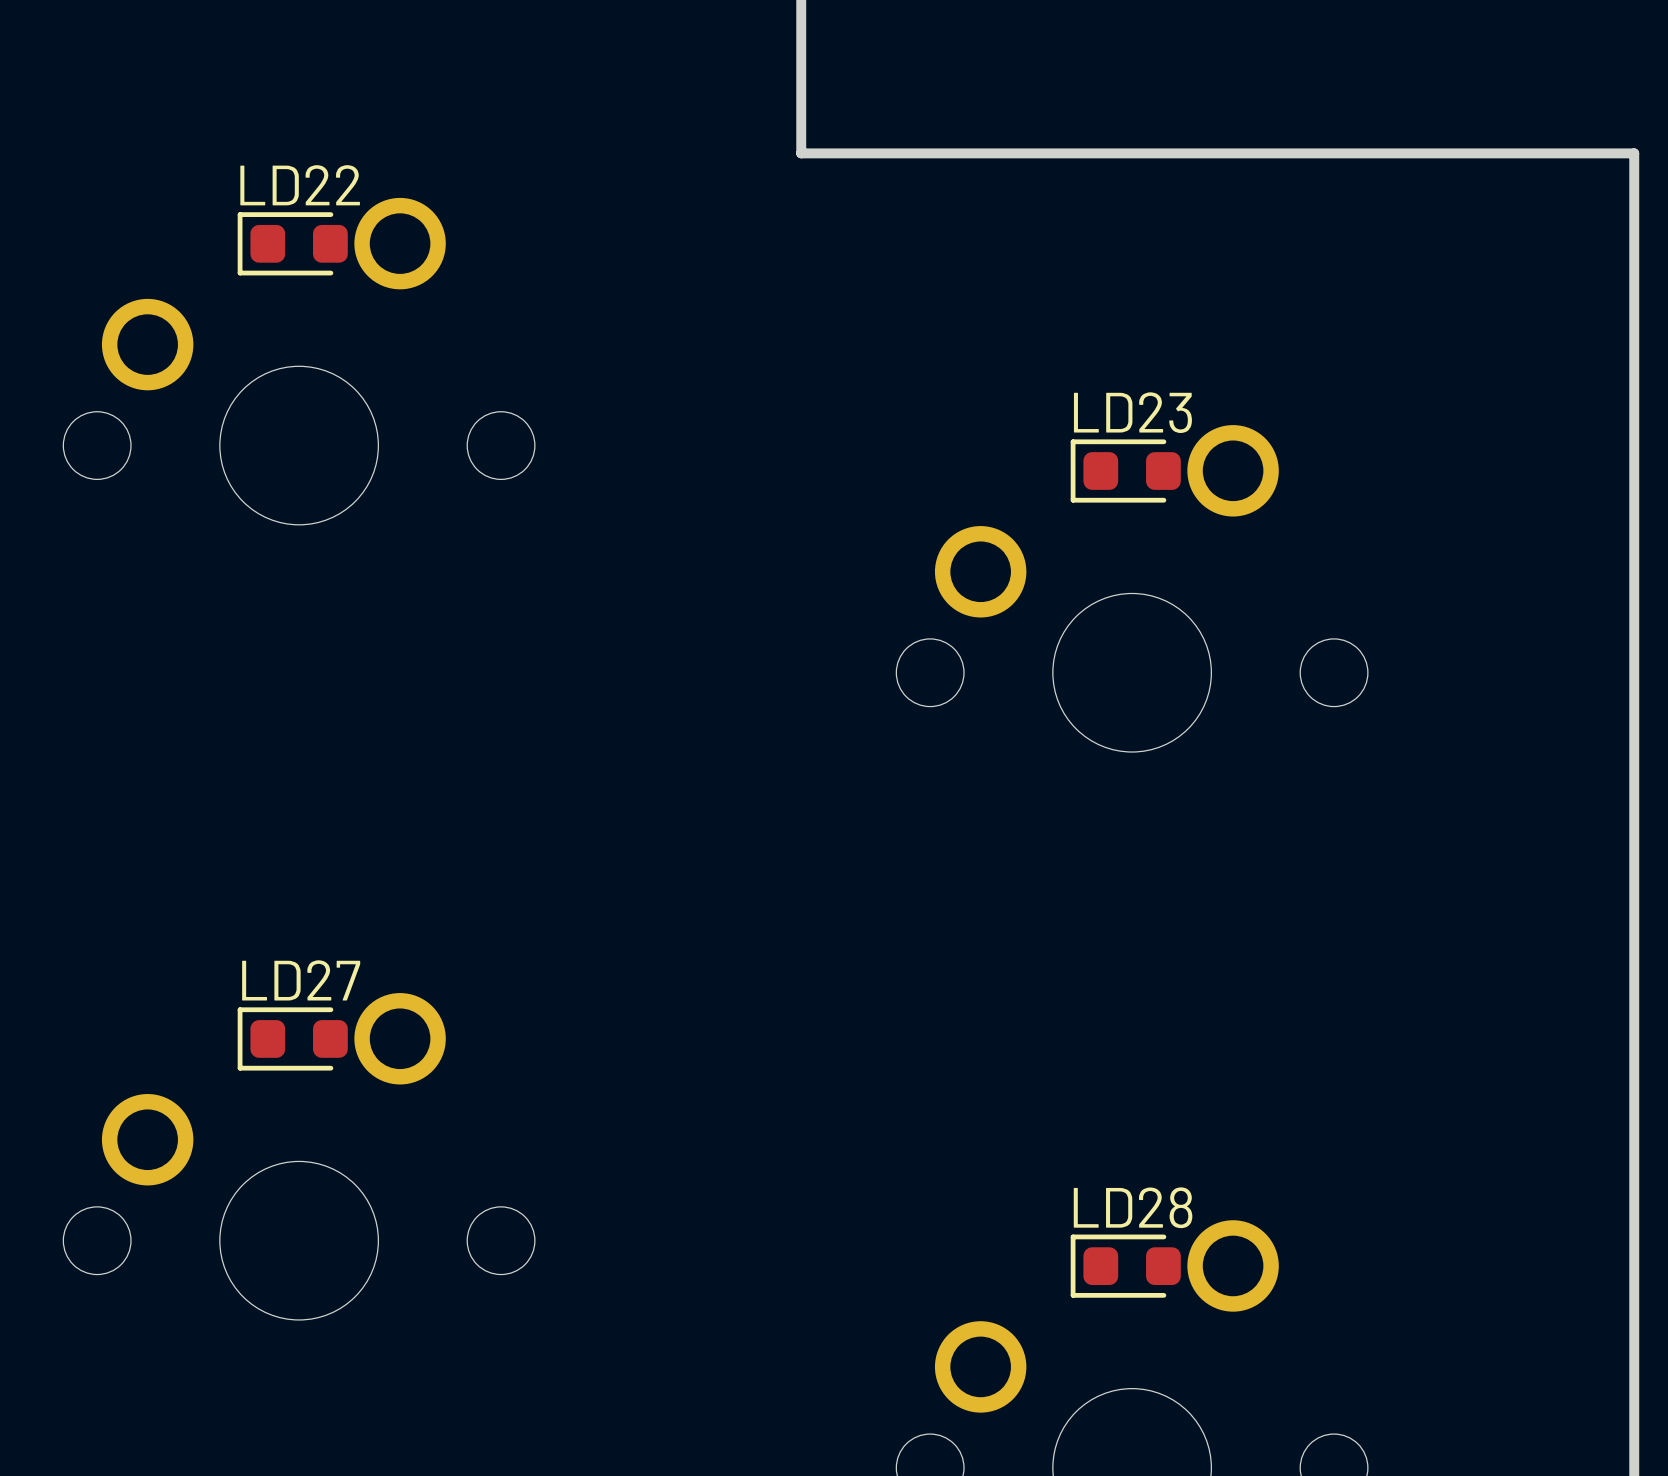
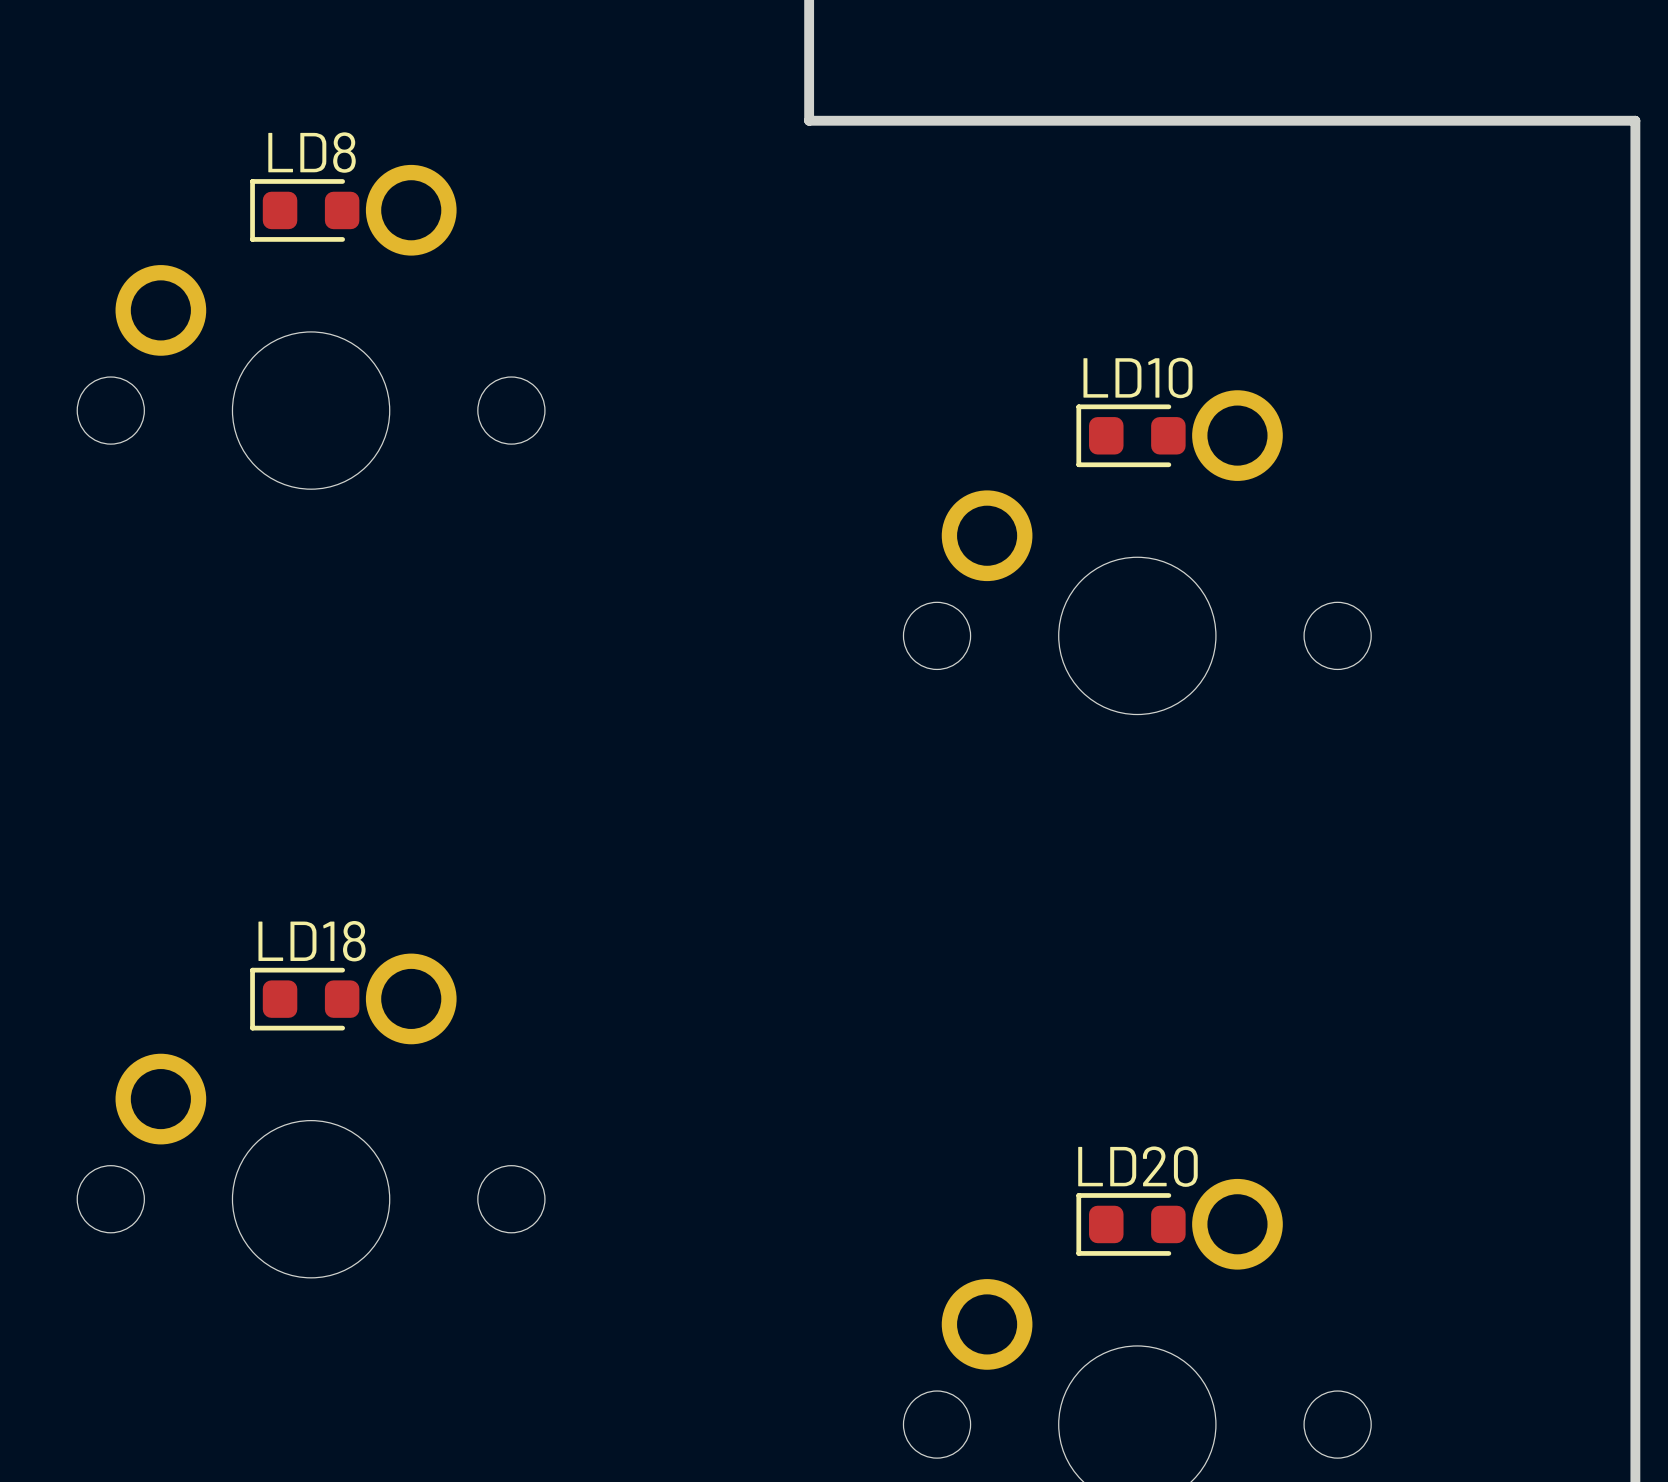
LD22 name: LD22 (300, 185) -> LD8 (312, 152)
LD23 name: LD23 (1132, 412) -> LD10 (1137, 377)
LD27 name: LD27 (301, 980) -> LD18 (312, 941)
LD28 name: LD28 (1133, 1207) -> LD20 (1137, 1166)

